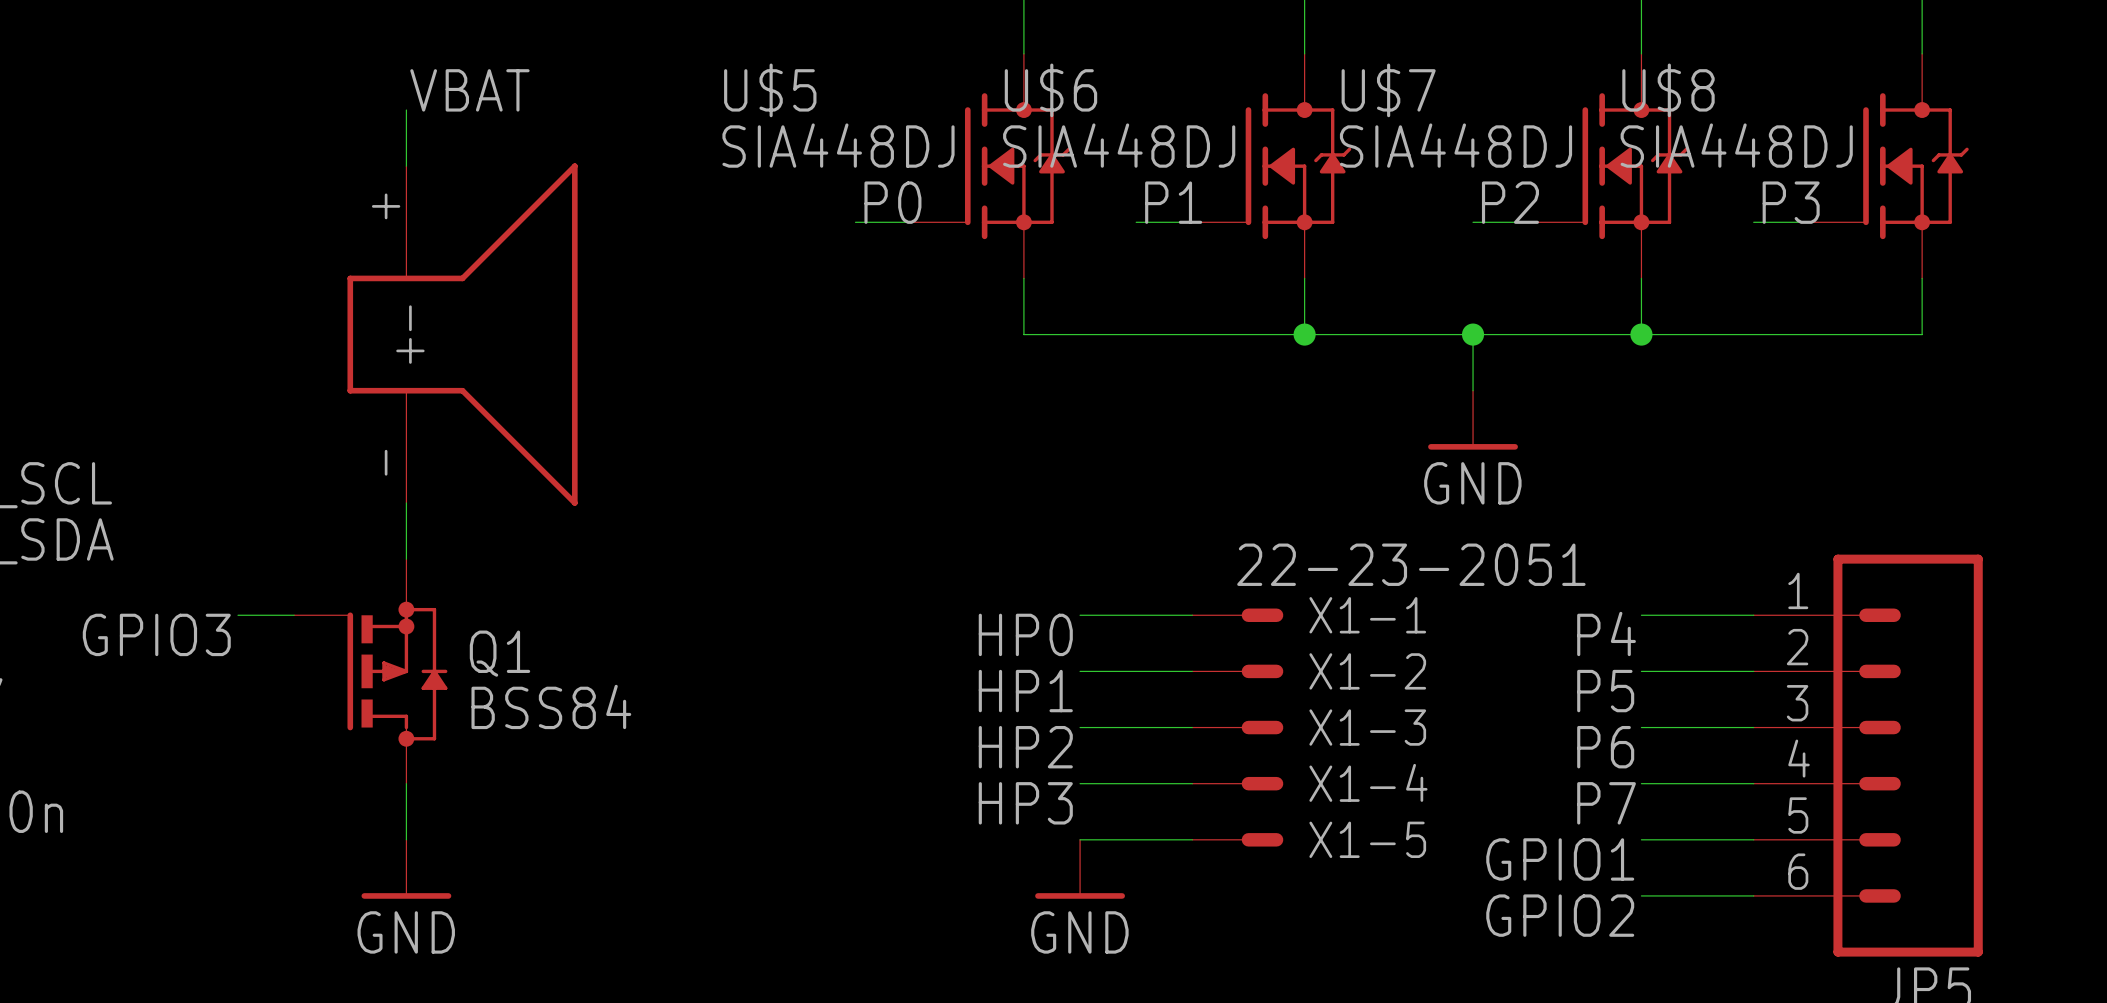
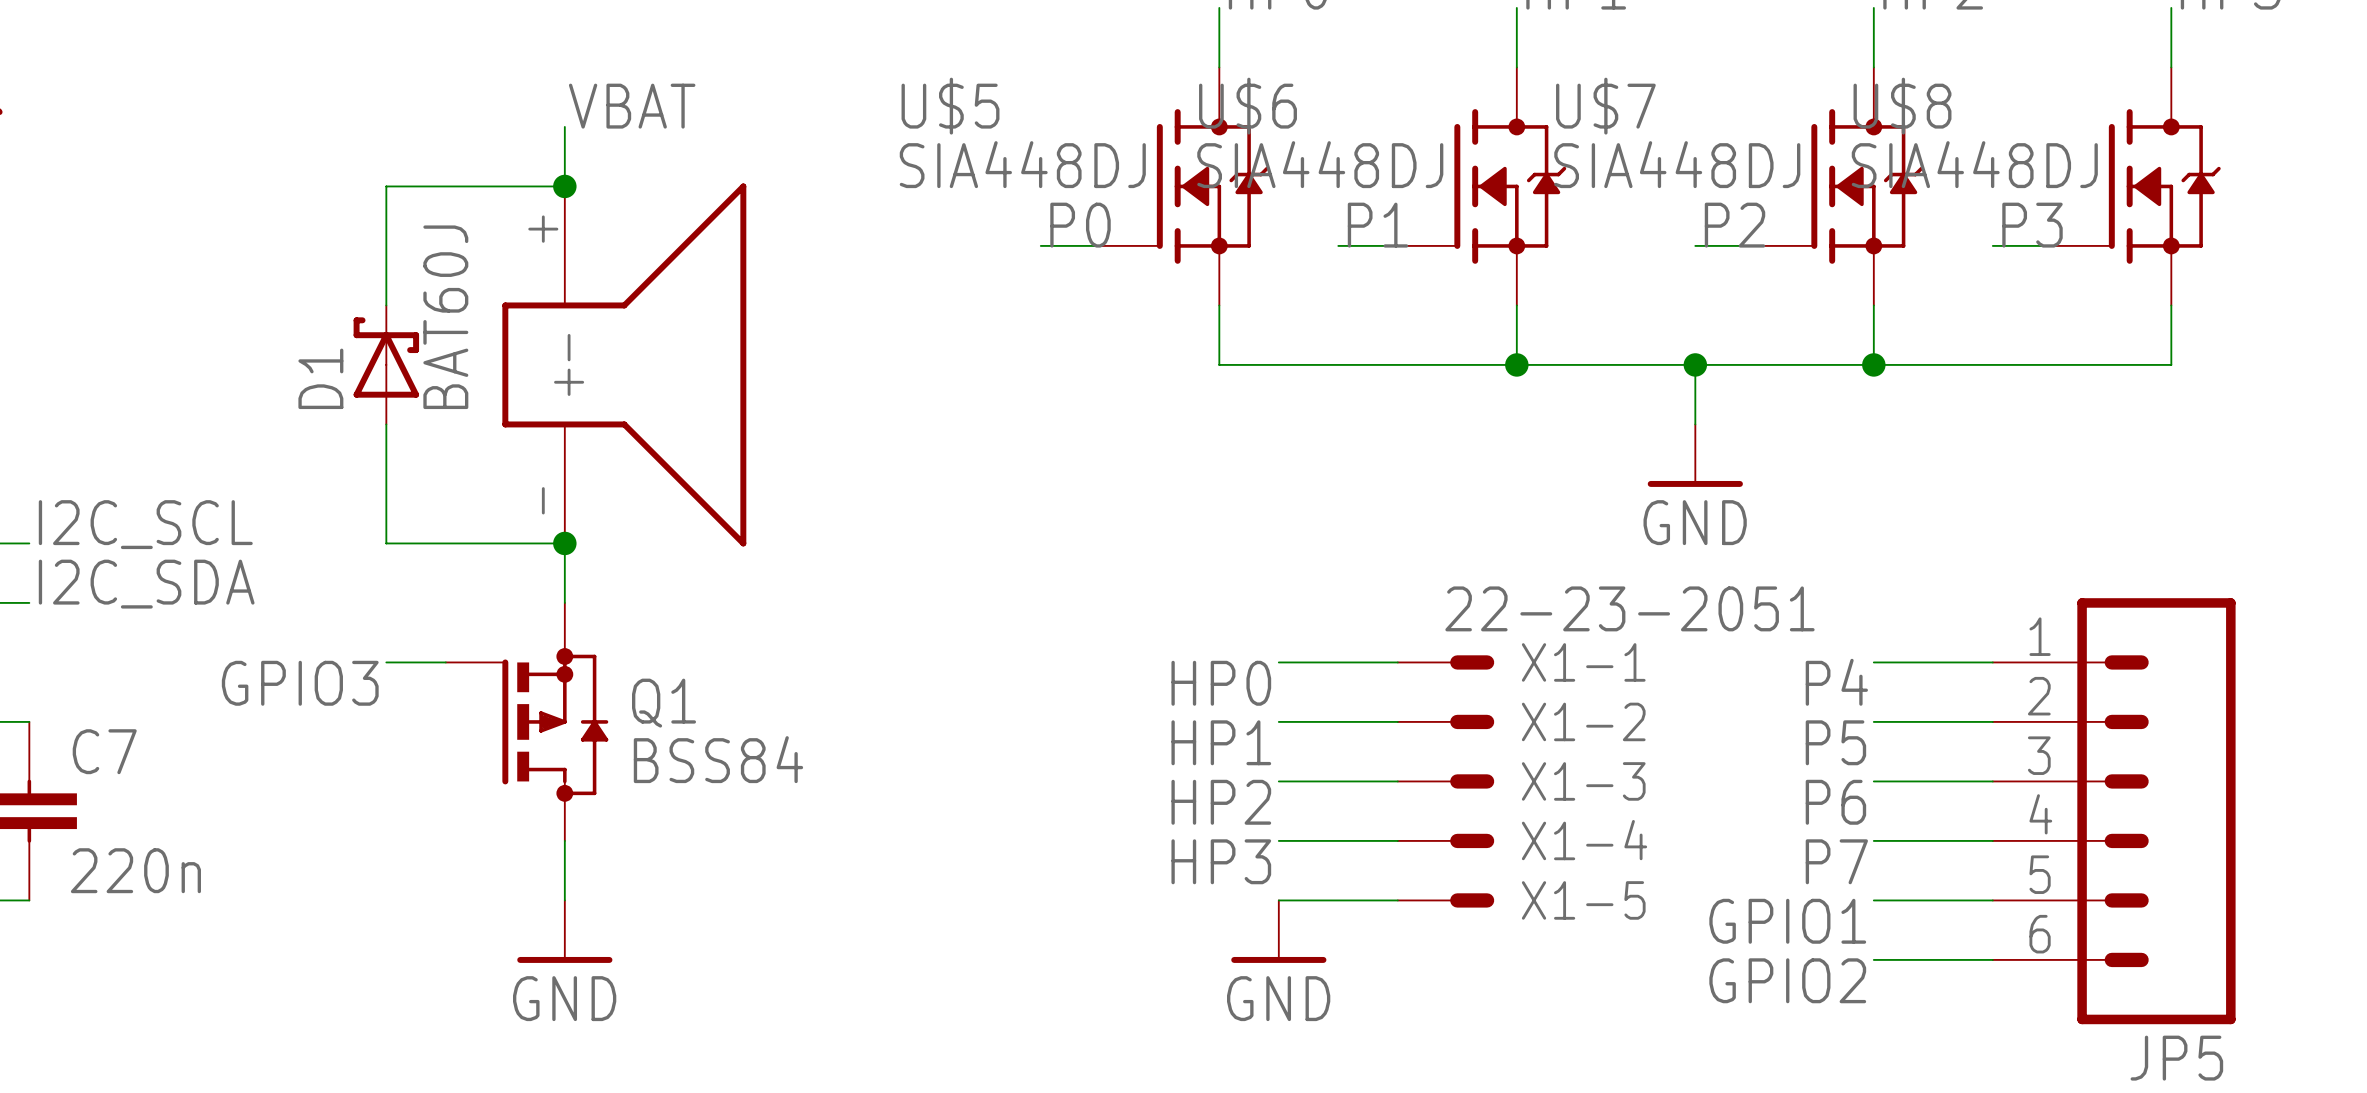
wire: none -> (564, 186) (386, 186) (386, 305)
junction: none -> (564, 186)
D1: none -> BAT60J (386, 364)
wire: none -> (386, 424) (386, 543) (564, 543)
junction: none -> (564, 543)

